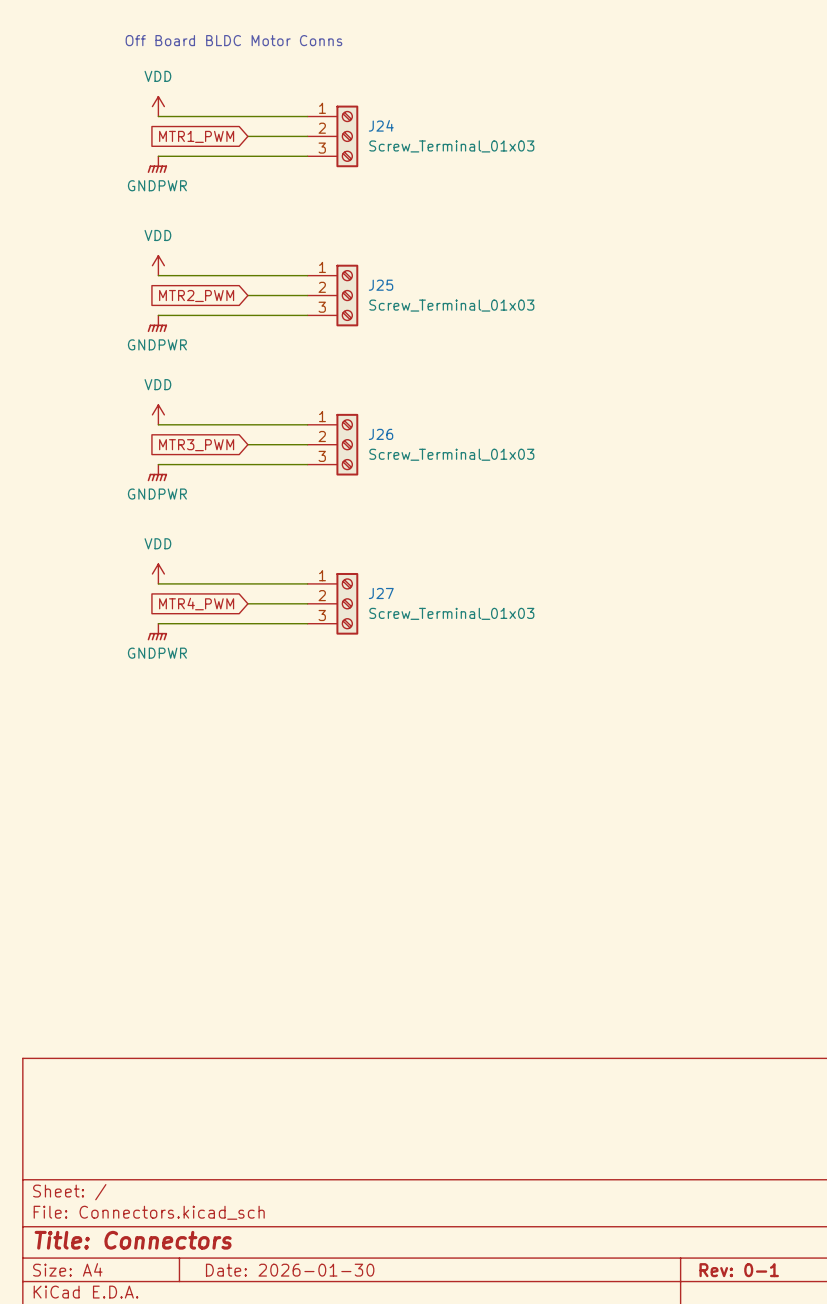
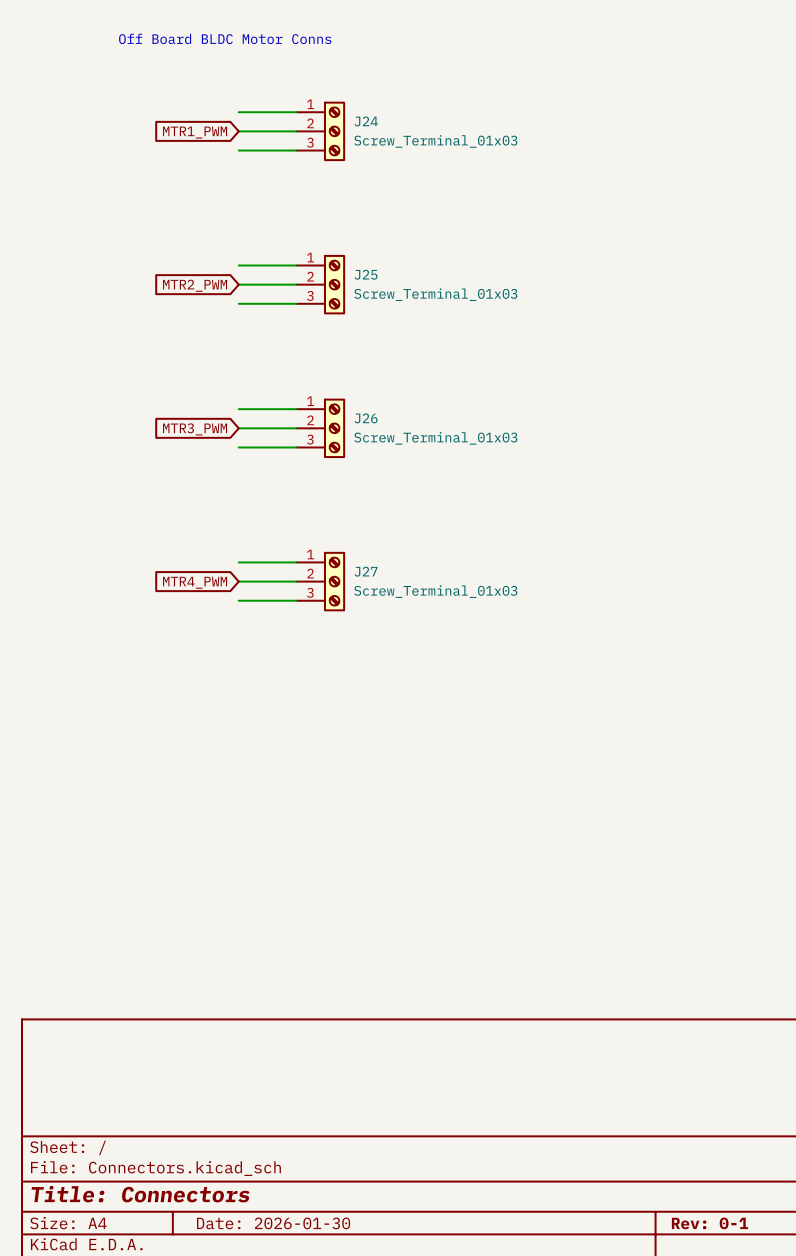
power symbol: VDD (158, 106) -> none
wire: (158, 116) (247, 116) -> none
wire: (158, 156) (247, 156) -> none
power symbol: GNDPWR (157, 164) -> none
power symbol: VDD (158, 265) -> none
wire: (158, 275) (247, 275) -> none
wire: (158, 315) (247, 315) -> none
power symbol: GNDPWR (157, 323) -> none
power symbol: VDD (158, 414) -> none
wire: (158, 424) (247, 424) -> none
wire: (158, 464) (247, 464) -> none
power symbol: GNDPWR (157, 472) -> none
power symbol: VDD (158, 573) -> none
wire: (158, 583) (247, 583) -> none
wire: (158, 623) (247, 623) -> none
power symbol: GNDPWR (157, 632) -> none

